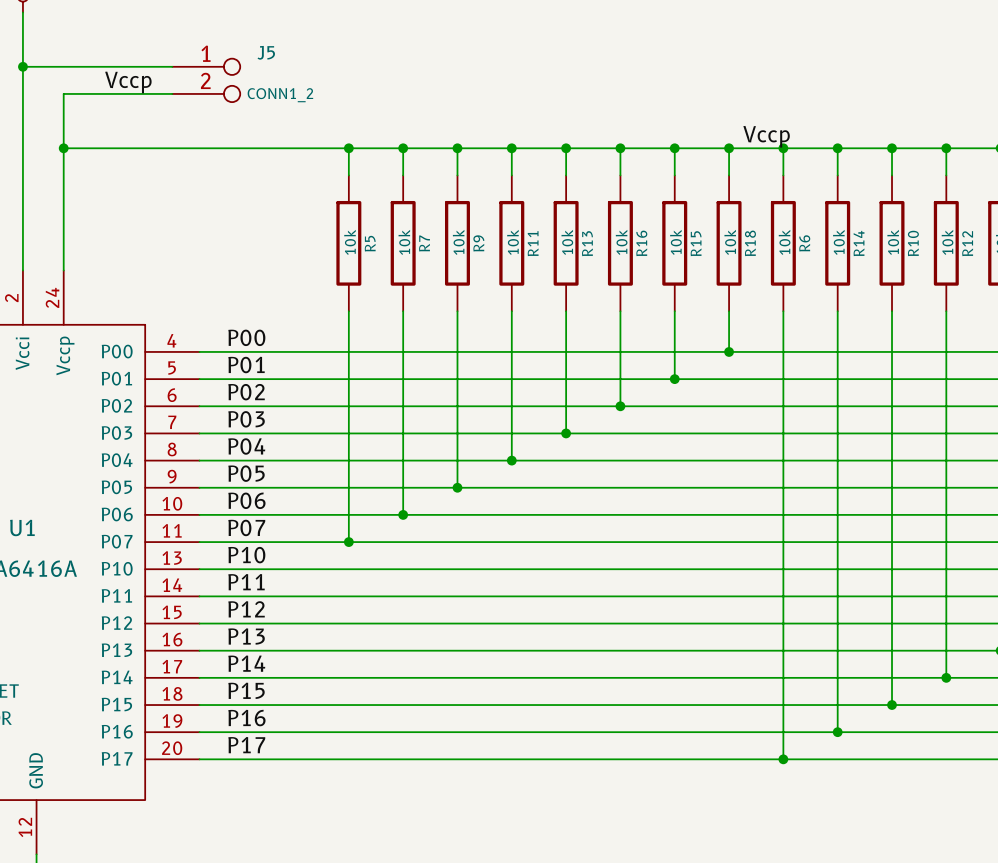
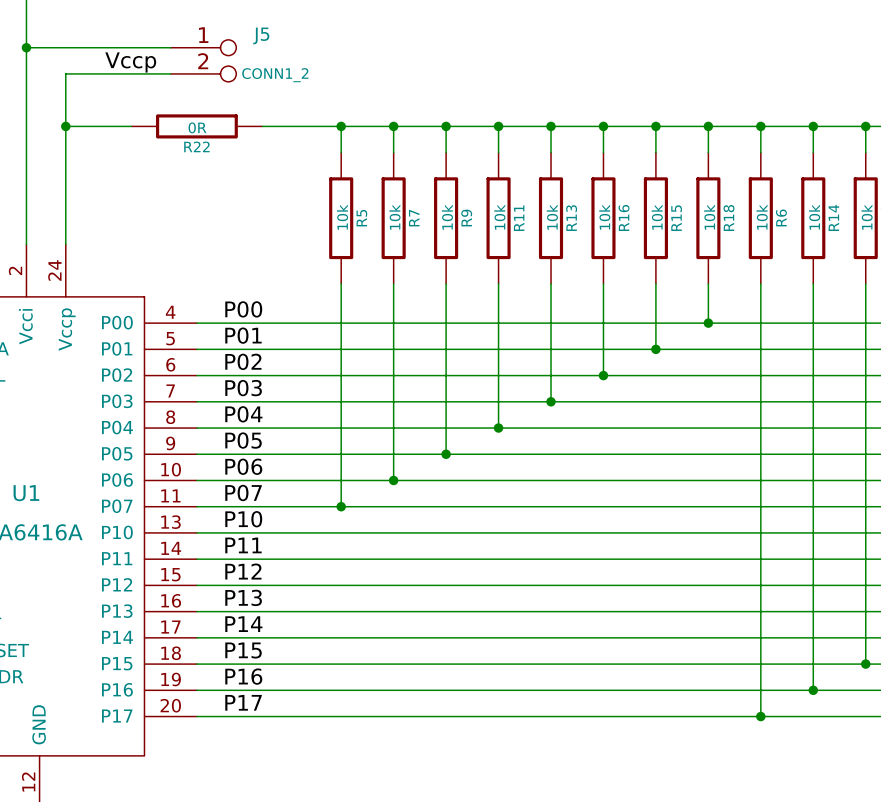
label: Vccp (766, 136) -> none
wire: (131, 148) (267, 148) -> none
R22: none -> 0R (196, 126)

